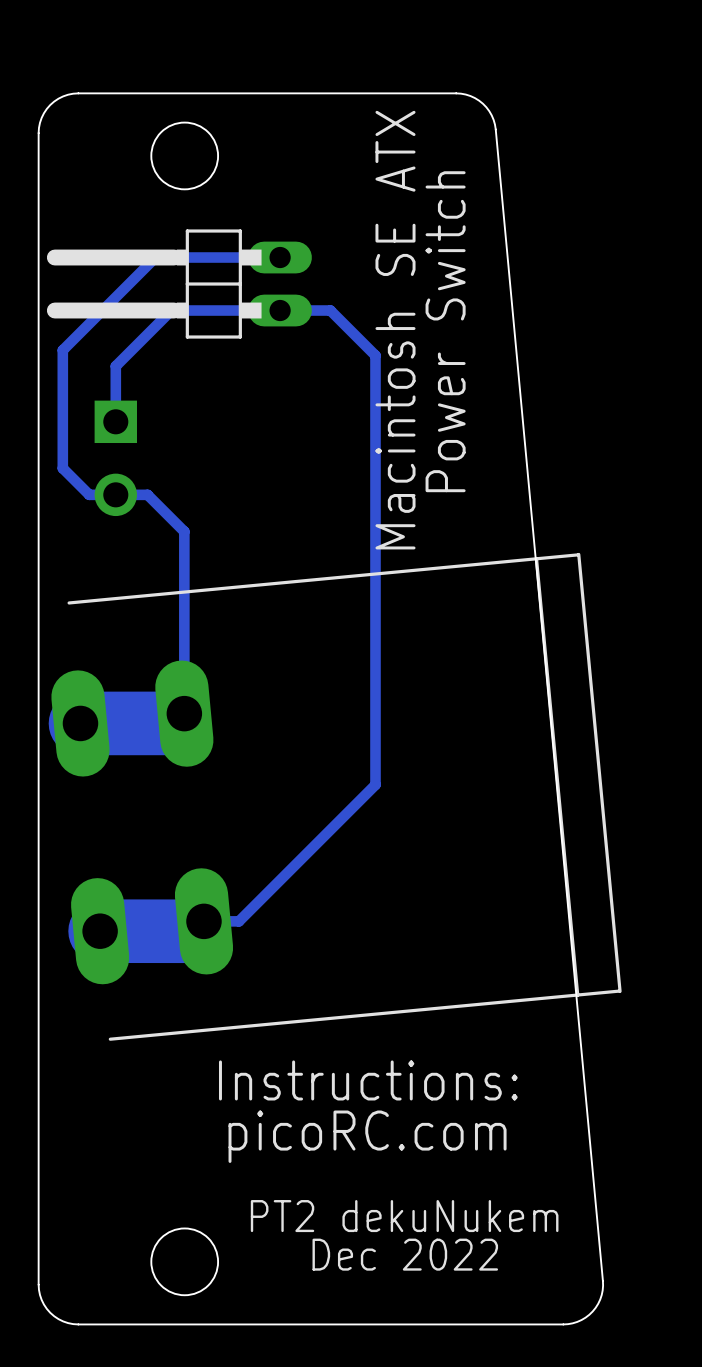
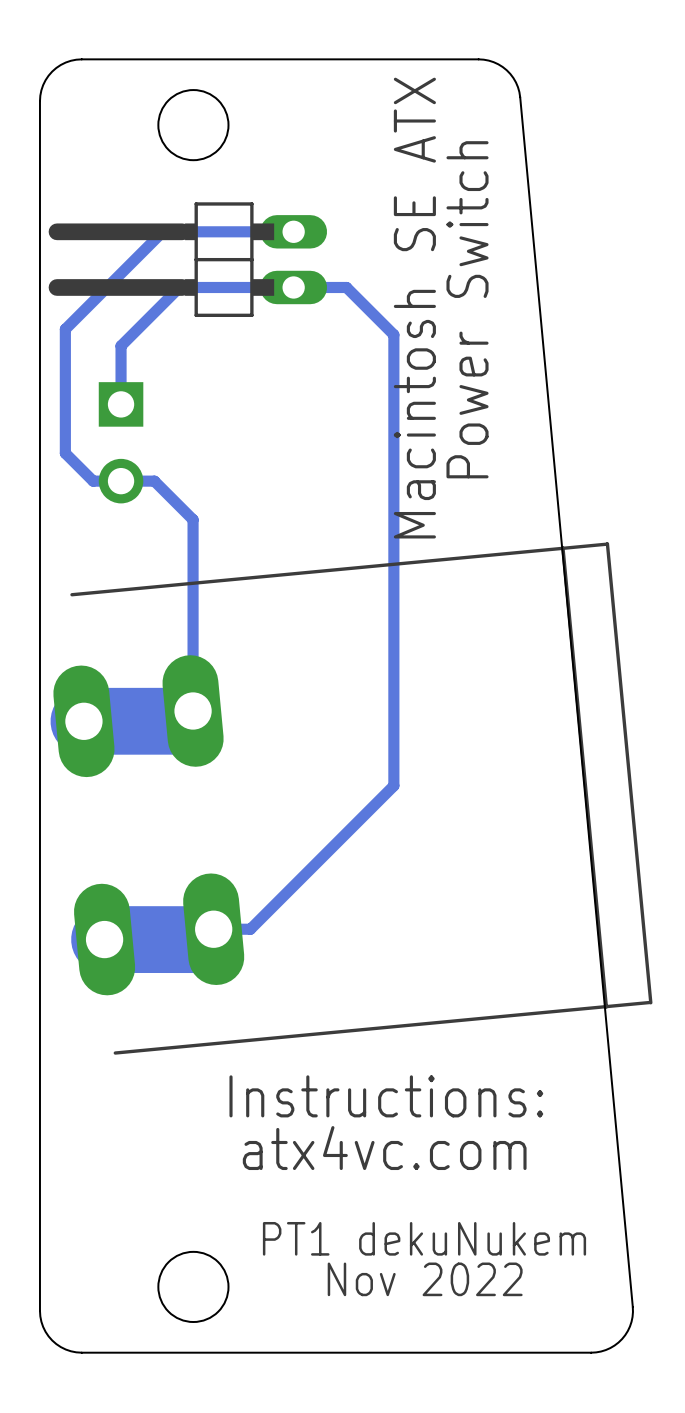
text: picoRC.com (367, 1136) -> atx4vc.com (384, 1148)
text: PT2 dekuNukem (404, 1216) -> PT1 dekuNukem (424, 1238)
text: Dec 2022 (405, 1254) -> Nov 2022 (425, 1279)

